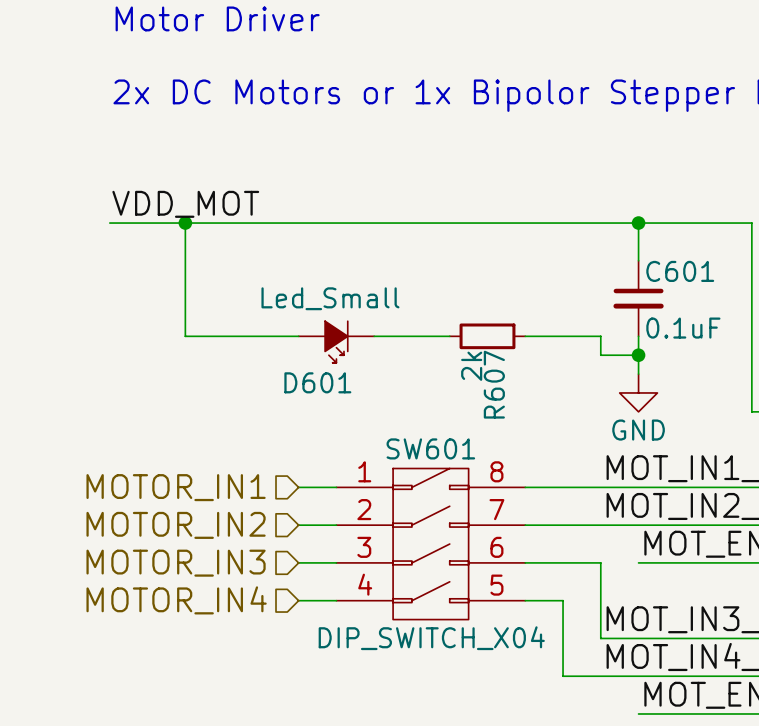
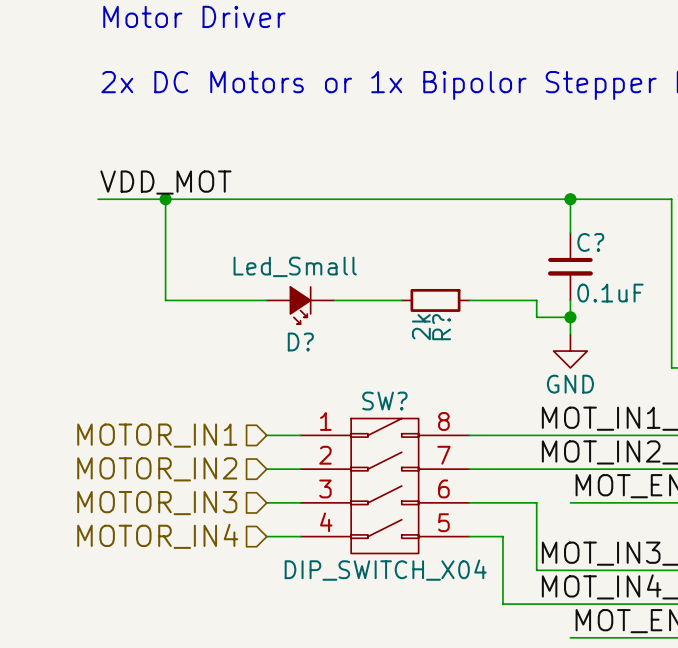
C601 name: C601 (680, 271) -> C? (590, 242)
D601 name: D601 (317, 382) -> D? (300, 341)
R607 name: R607 (494, 384) -> R? (441, 327)
SW601 name: SW601 (430, 448) -> SW? (384, 401)

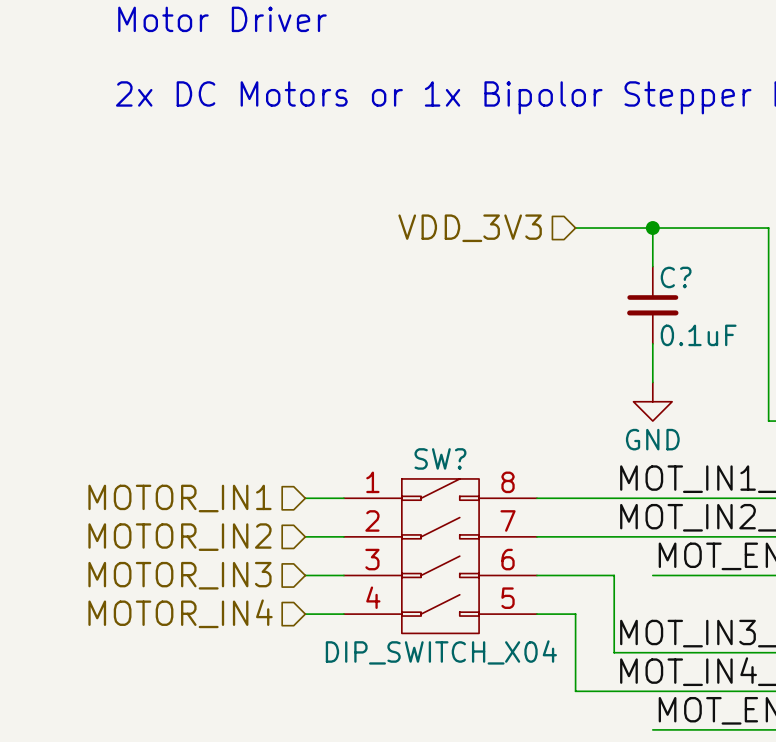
label: VDD_MOT (165, 182) -> none
wire: (98, 199) (502, 199) -> none
wire: (165, 199) (165, 300) (266, 300) -> none
junction: (165, 199) -> none
hierarchical label: none -> VDD_3V3 (470, 228)
wire: (334, 300) (401, 300) -> none
R?: 2k (435, 300) -> none
wire: (469, 300) (536, 300) (536, 317) (570, 317) -> none
D?: Led_Small (300, 305) -> none
junction: (570, 317) -> none

